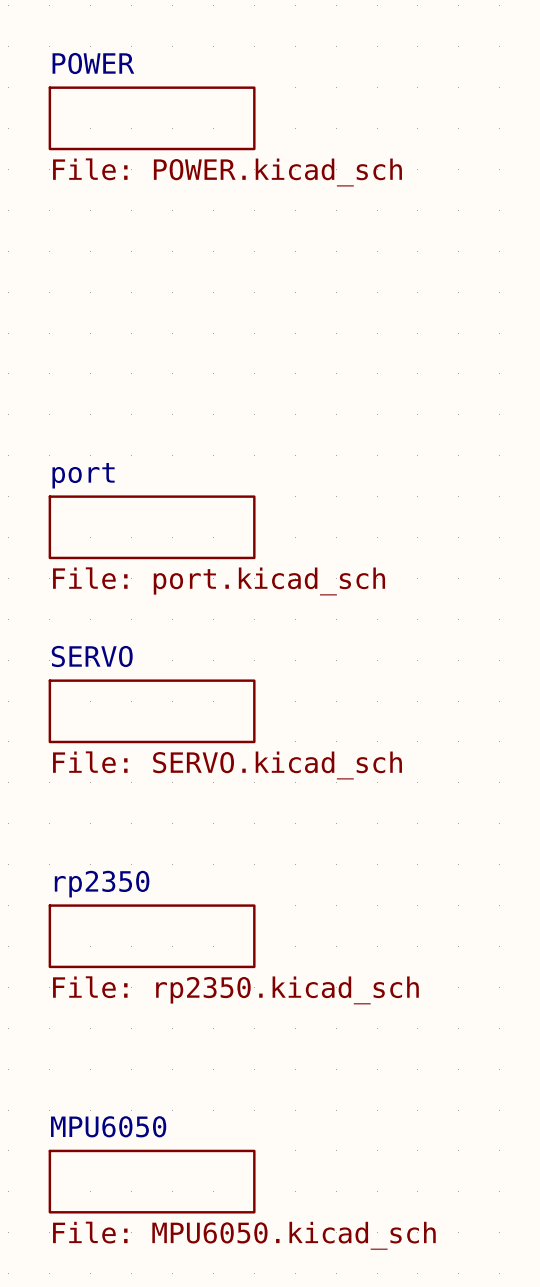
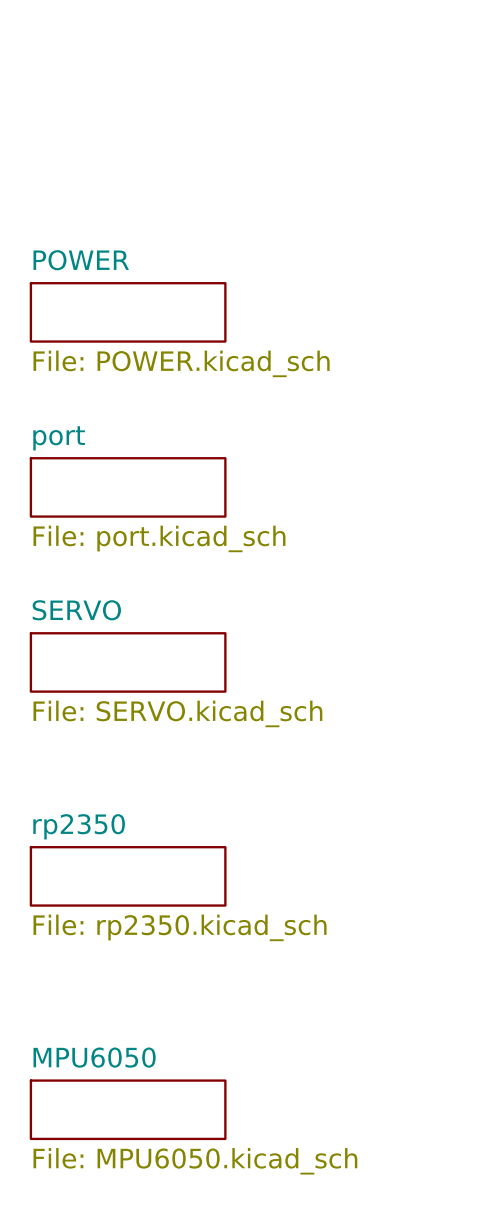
sheet POWER position: (152, 118) -> (128, 312)

